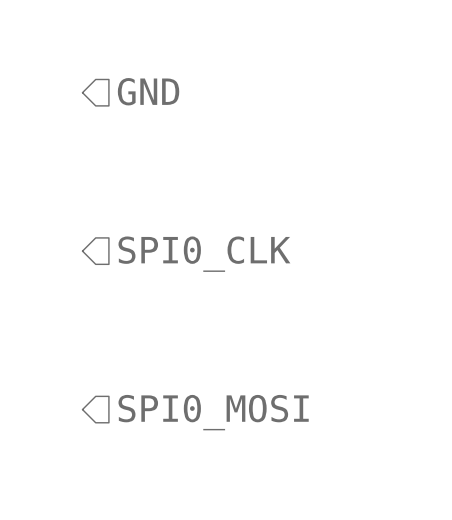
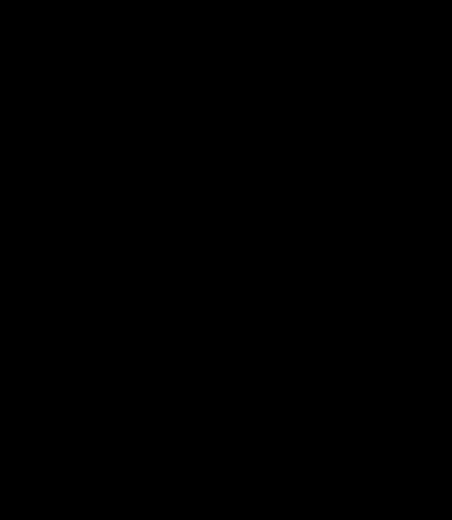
hierarchical label: GND (148, 91) -> none
hierarchical label: SPI0_CLK (204, 254) -> none
hierarchical label: SPI0_MOSI (213, 412) -> none

